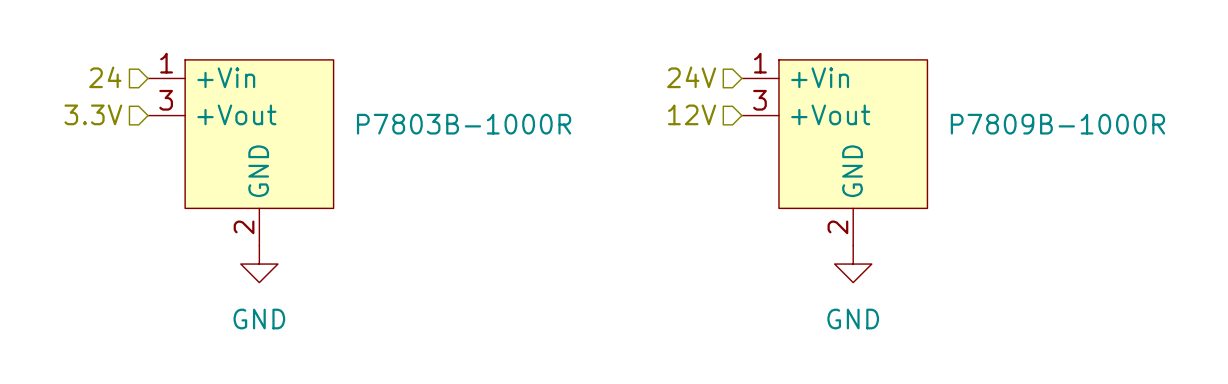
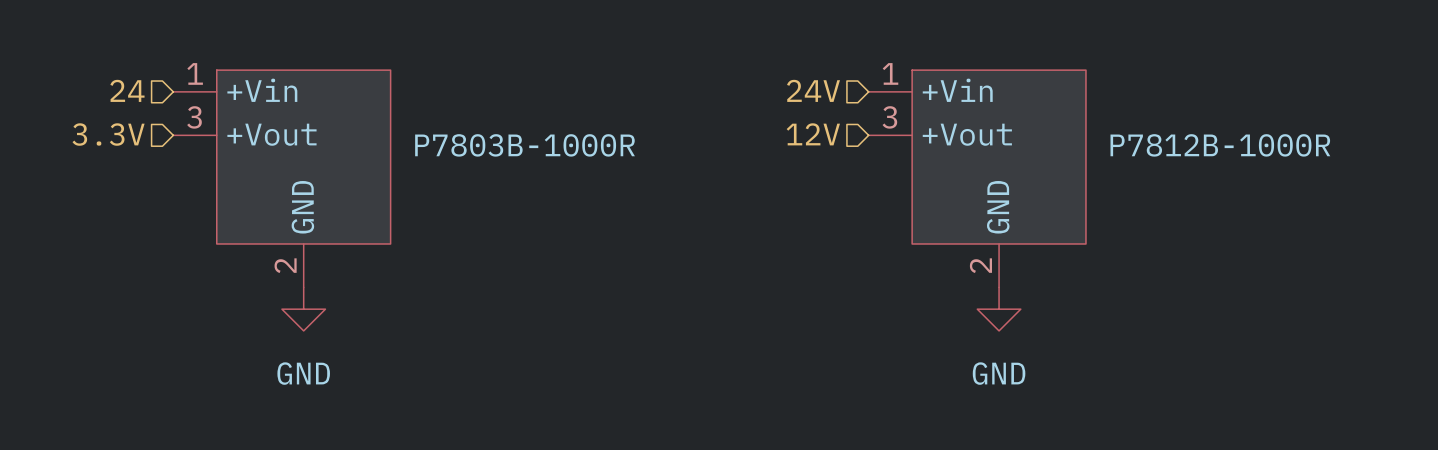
P7809B-1000R name: P7809B-1000R (1057, 124) -> P7812B-1000R (1220, 145)

